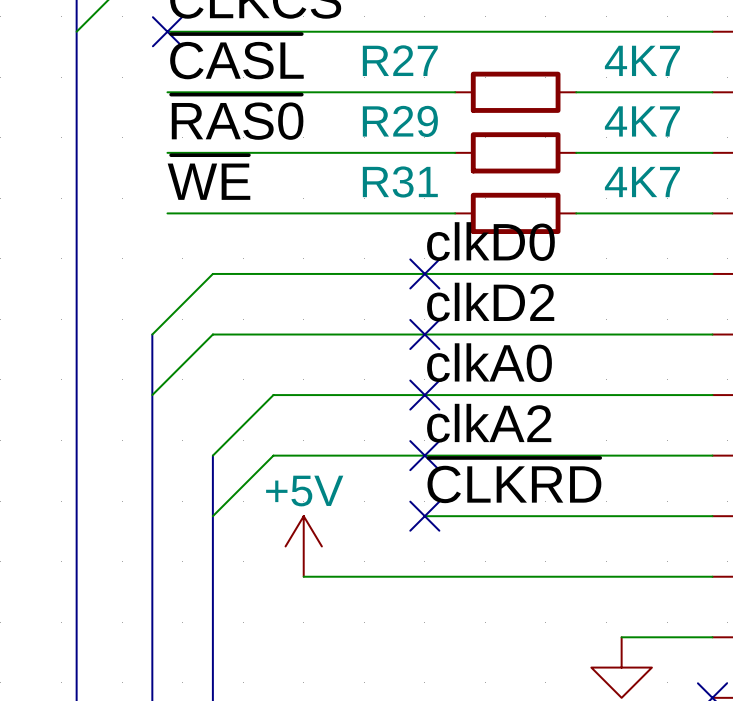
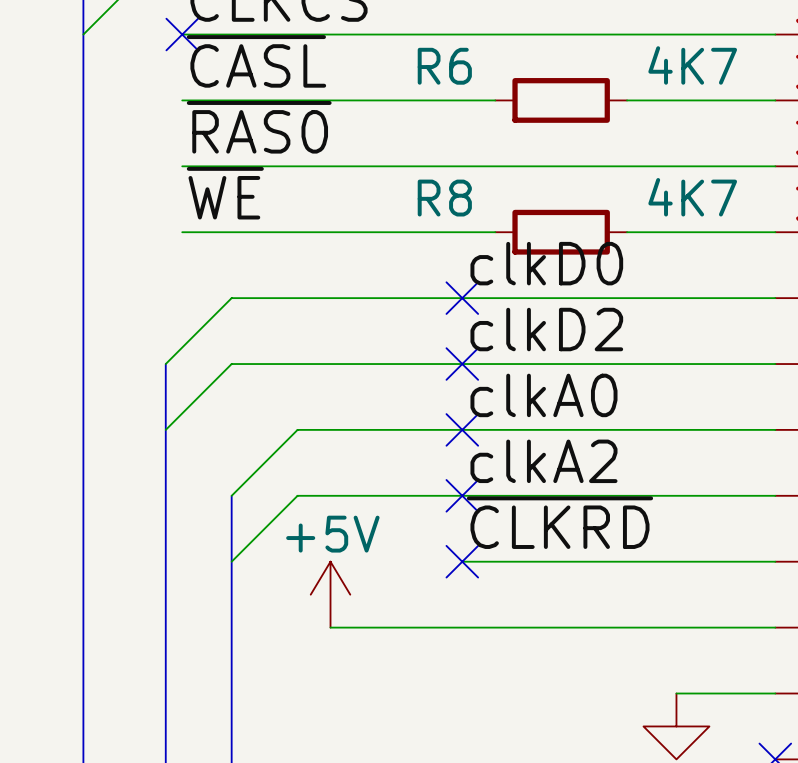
R27 name: R27 (400, 60) -> R6 (444, 66)
wire: none -> (495, 166) (627, 166)
R29: 4K7 (515, 152) -> none
R31 name: R31 (400, 181) -> R8 (444, 198)

